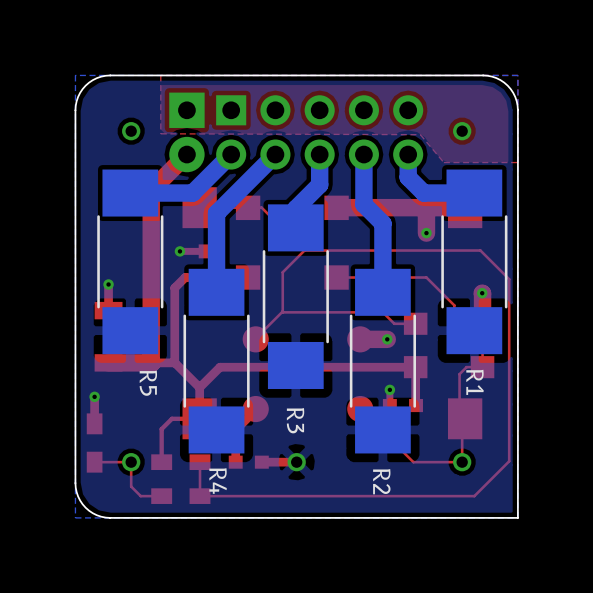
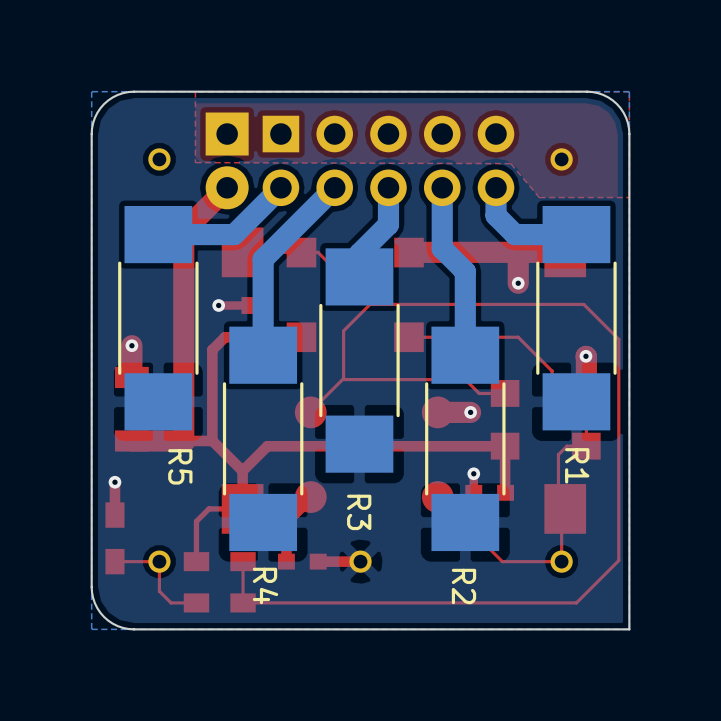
top track width: thin (108, 284) (108, 310) -> thick (131, 345) (131, 377)

